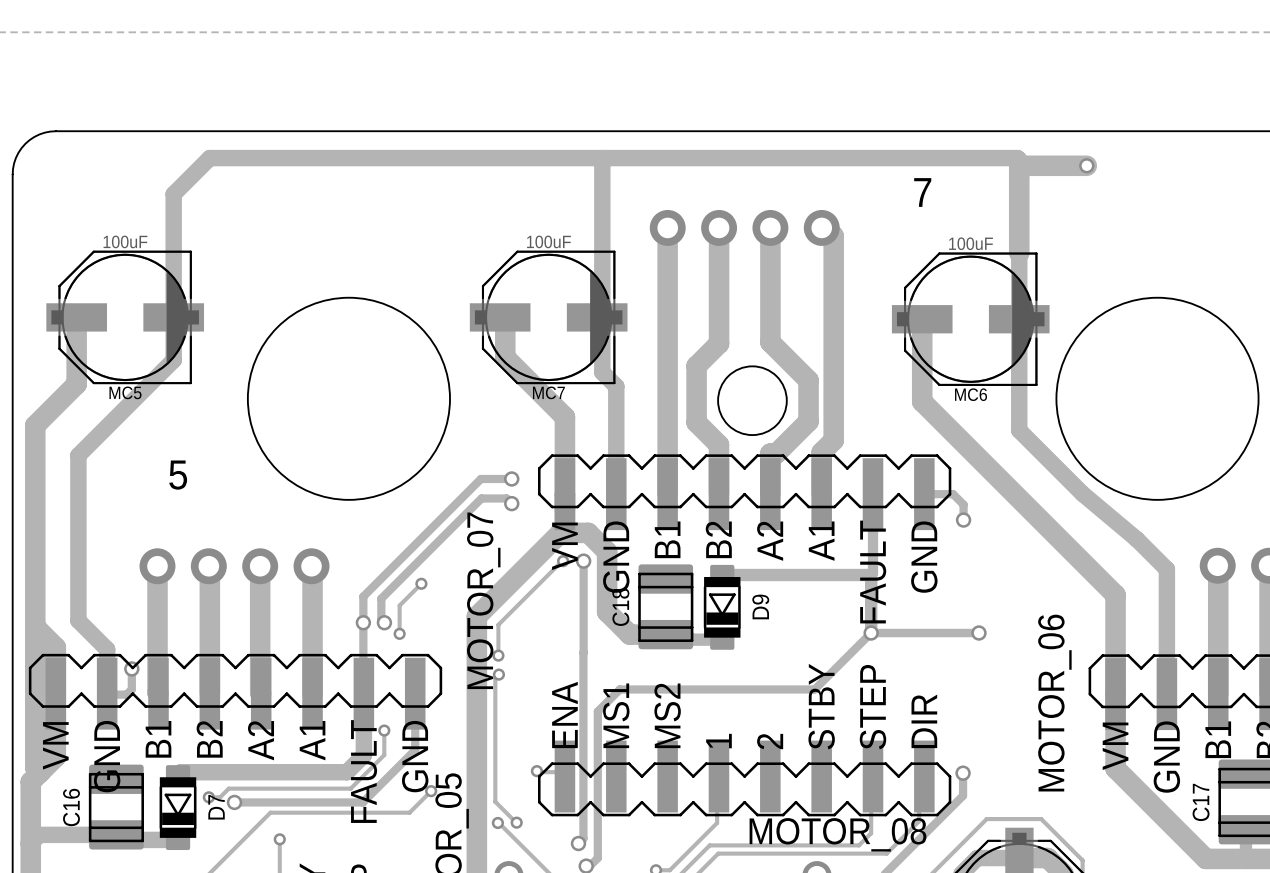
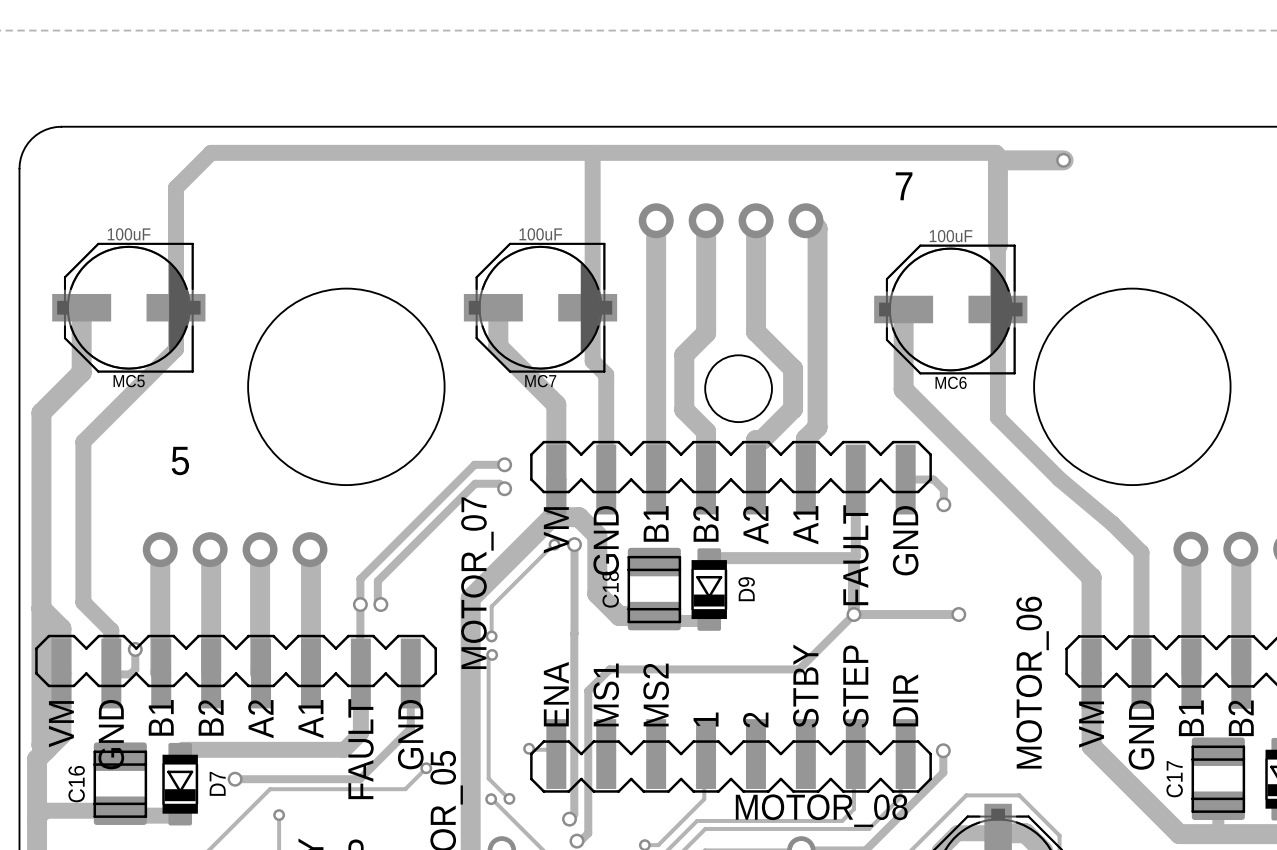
track: (421, 583) (399, 605) (399, 633) -> none
via: (421, 583) -> none
via: (399, 633) -> none
track: (384, 730) (384, 755) (350, 788) (228, 788) (220, 797) (208, 797) -> none
via: (384, 730) -> none
via: (208, 797) -> none

